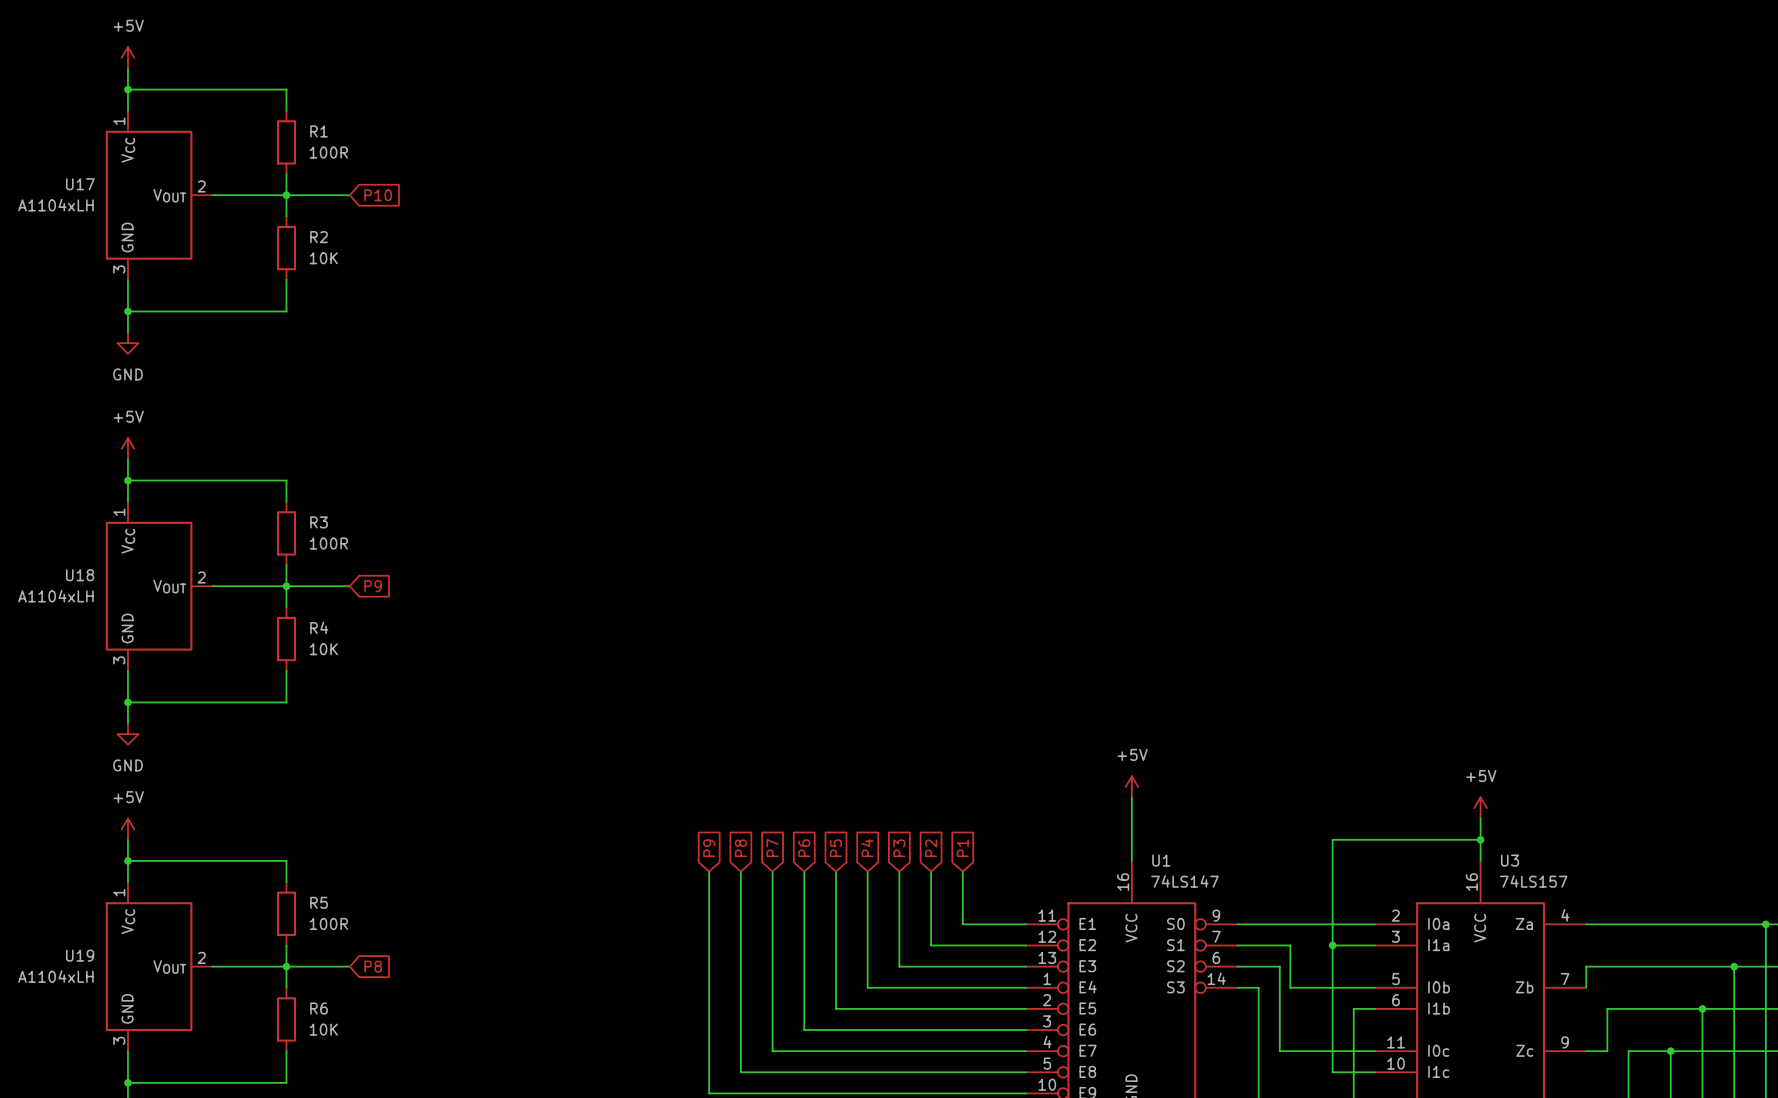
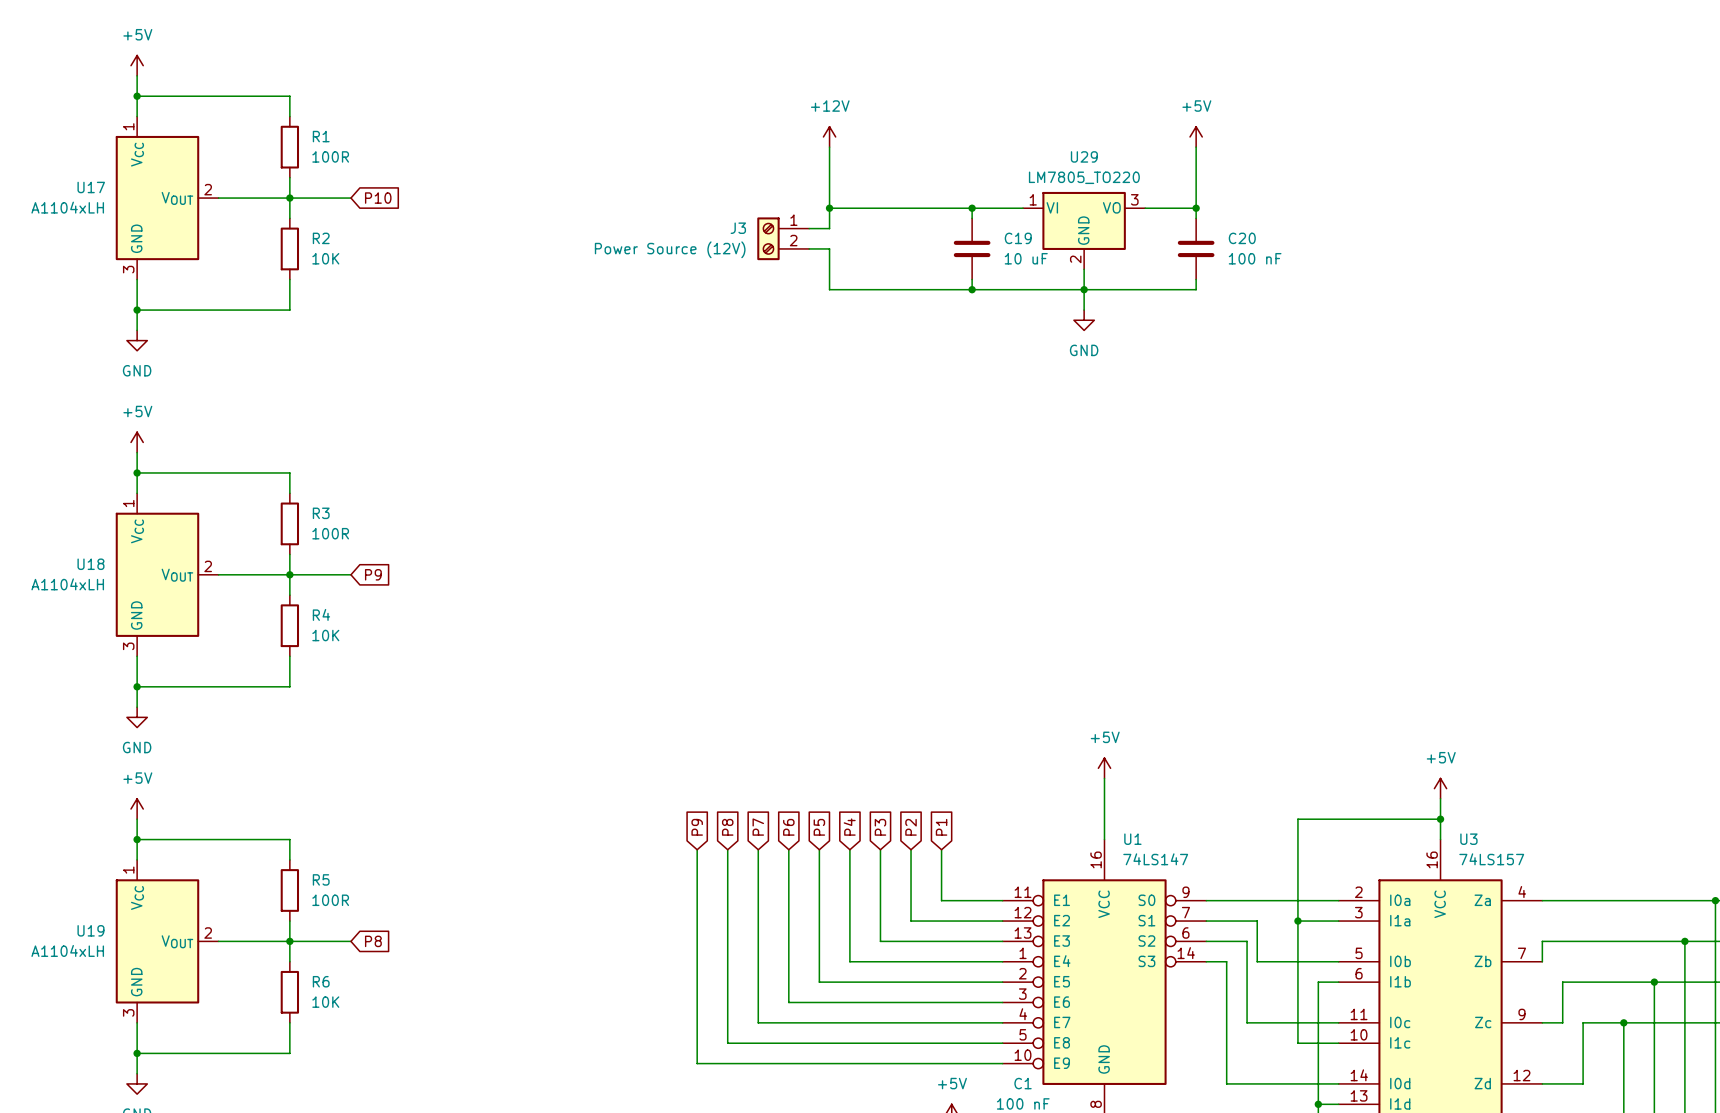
power symbol: none -> +12V (829, 136)
power symbol: none -> +5V (1196, 136)
wire: none -> (829, 147) (829, 228) (809, 228)
wire: none -> (1196, 147) (1196, 218)
wire: none -> (829, 208) (1023, 208)
junction: none -> (829, 208)
wire: none -> (972, 208) (972, 218)
junction: none -> (972, 208)
wire: none -> (1145, 208) (1196, 208)
junction: none -> (1196, 208)
U29: none -> LM7805_TO220 (1084, 230)
J3: none -> Power Source (12V) (783, 238)
wire: none -> (809, 248) (829, 248) (829, 289) (1196, 289) (1196, 279)
C19: none -> 10 uF (972, 248)
C20: none -> 100 nF (1196, 248)
wire: none -> (1084, 269) (1084, 310)
wire: none -> (972, 279) (972, 289)
junction: none -> (972, 289)
junction: none -> (1084, 289)
power symbol: none -> GND (1084, 320)

